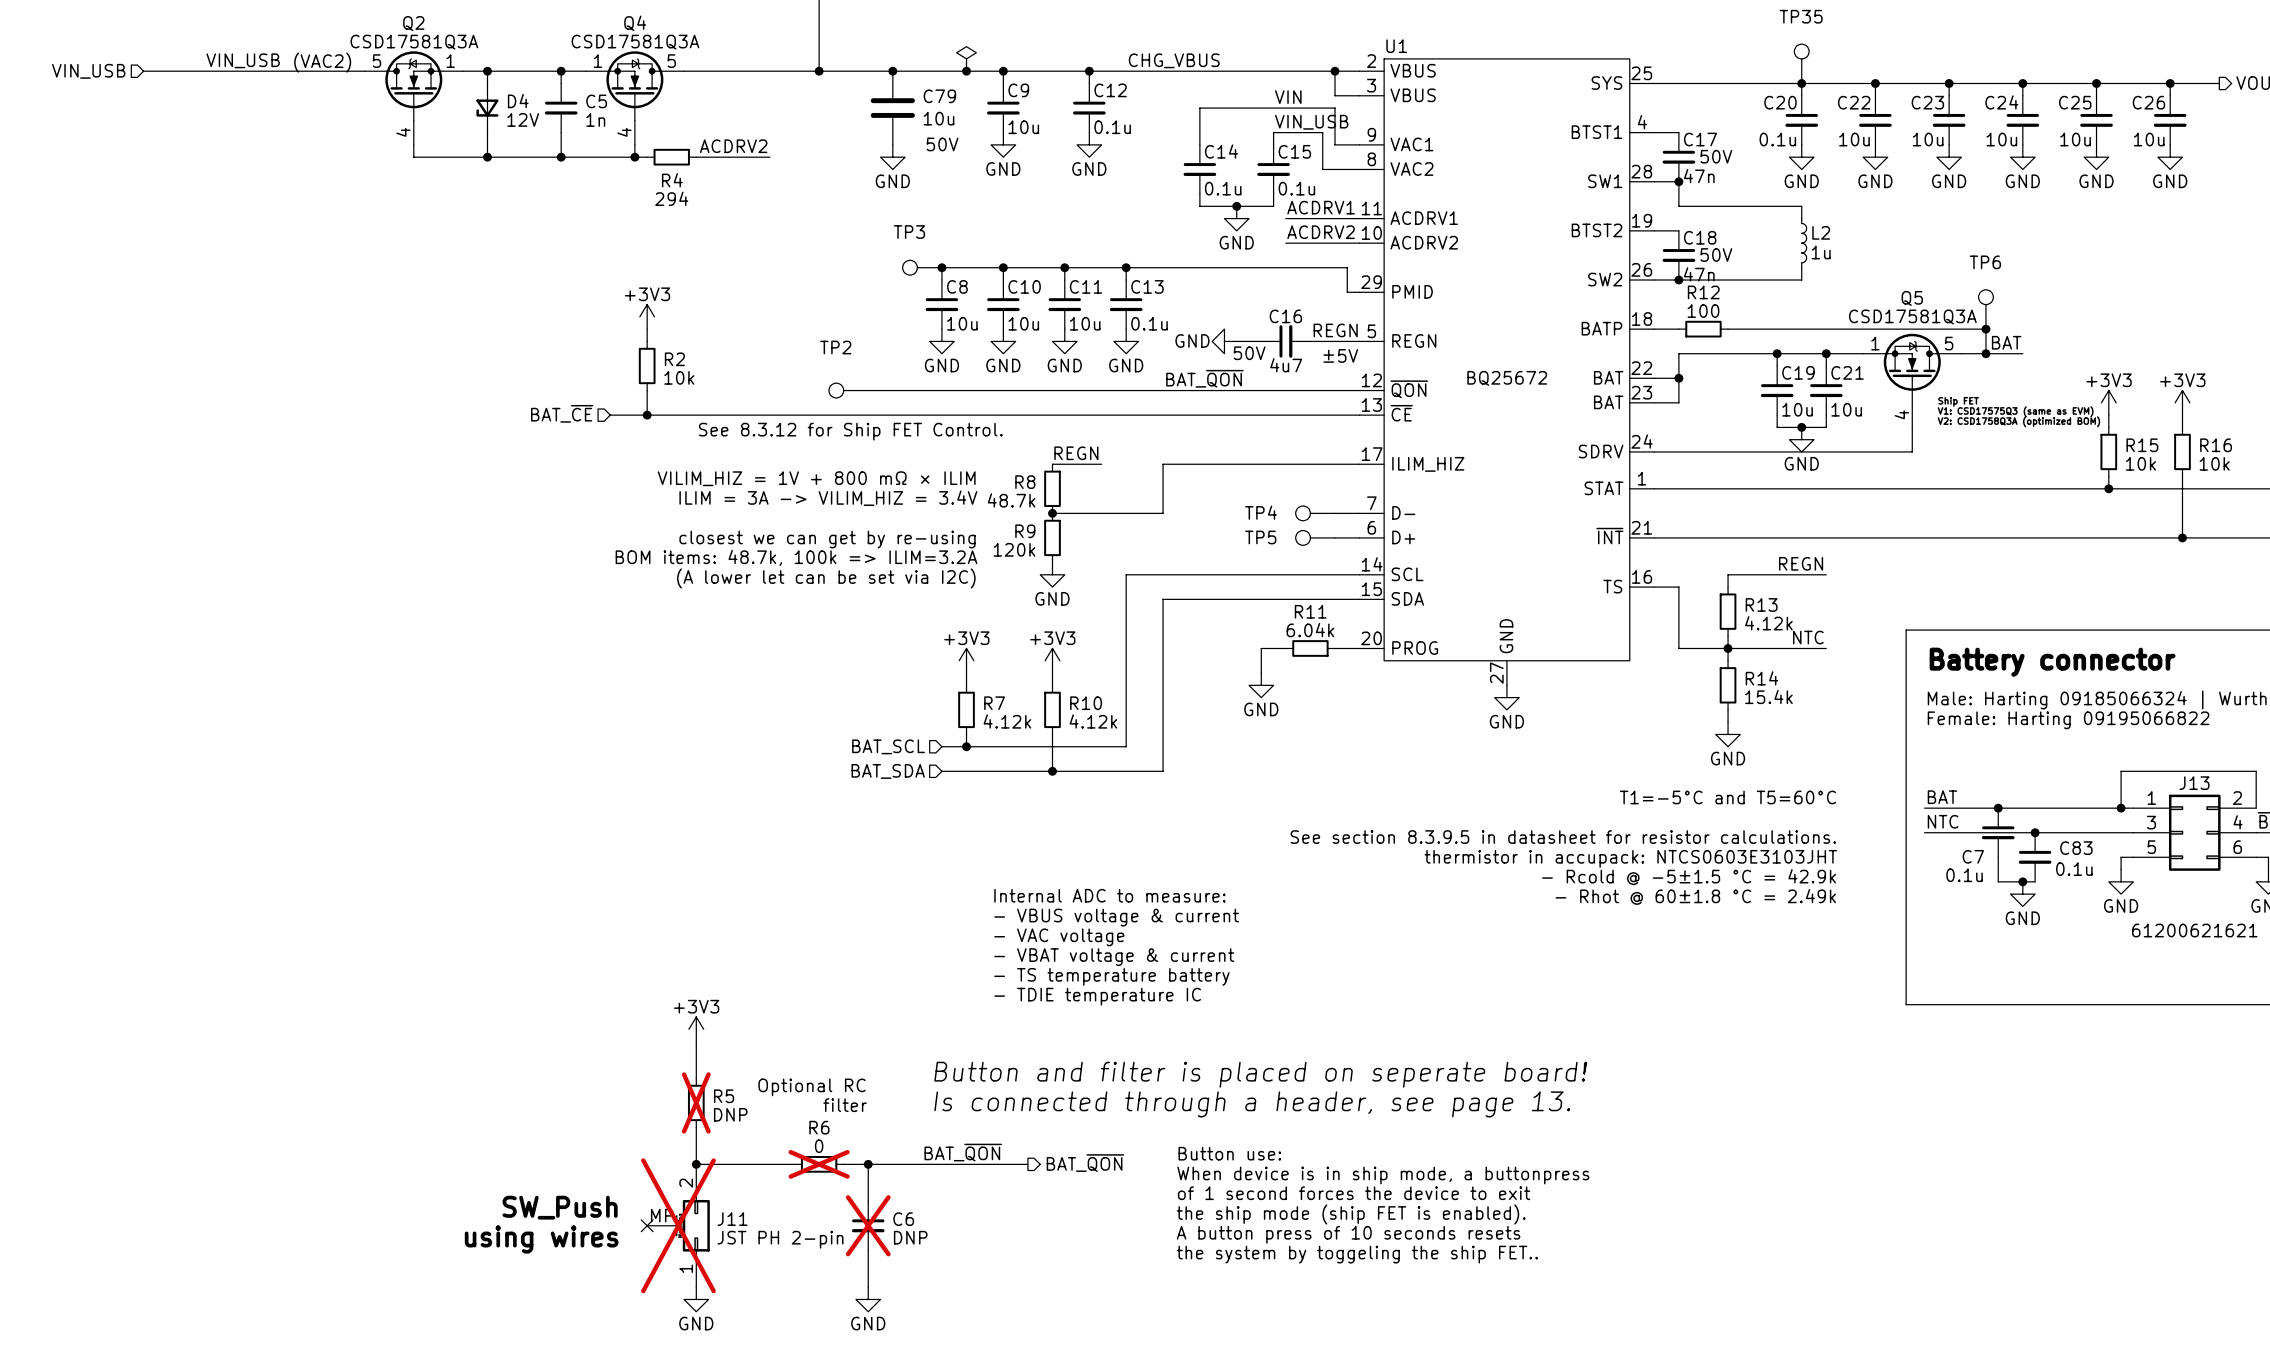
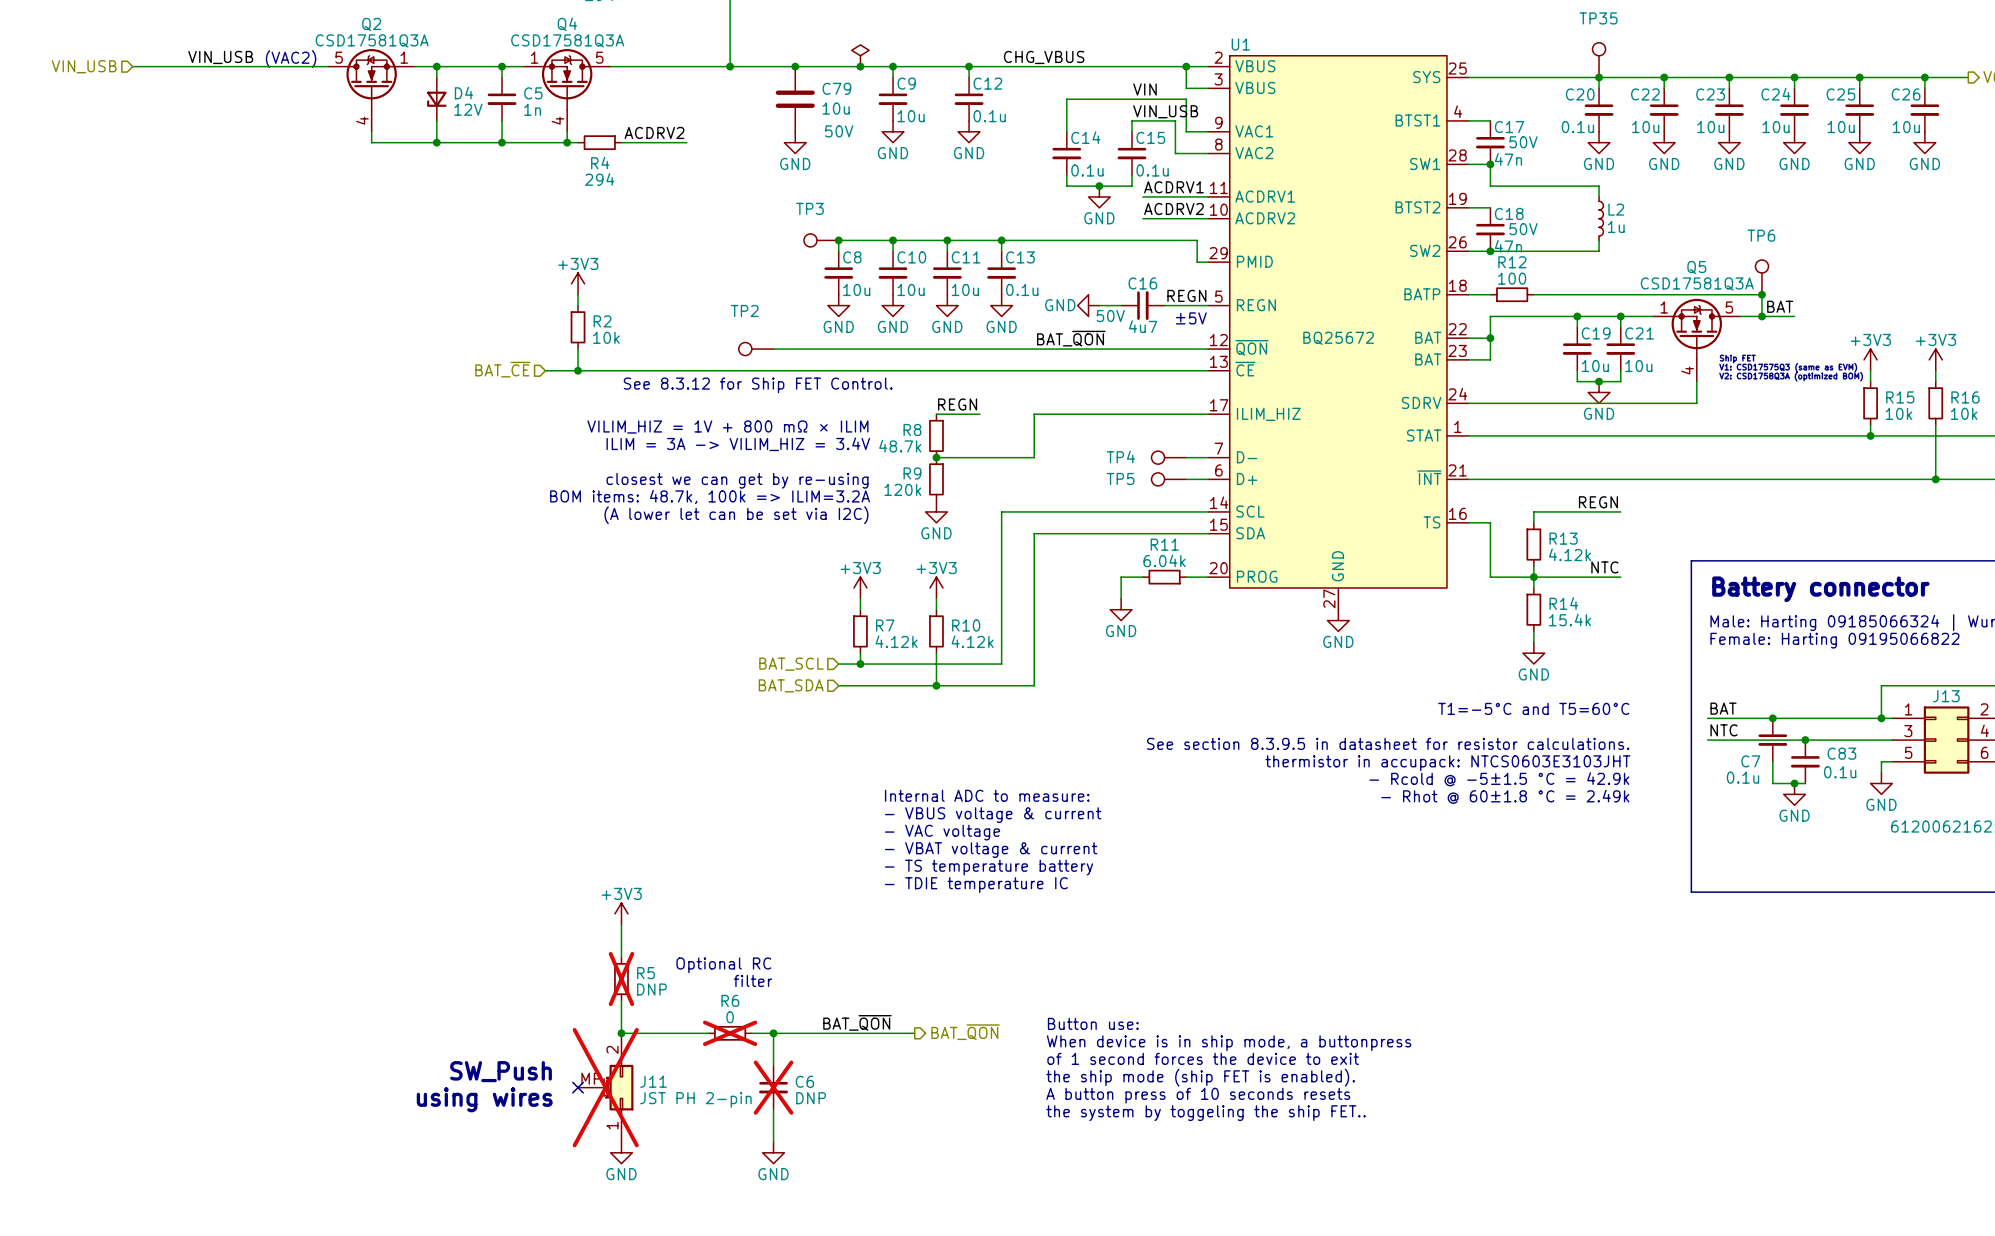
text: Button and filter is placed on seperate board! (1260, 1074) -> none
text: Is connected through a header, see page 13. (1252, 1104) -> none

